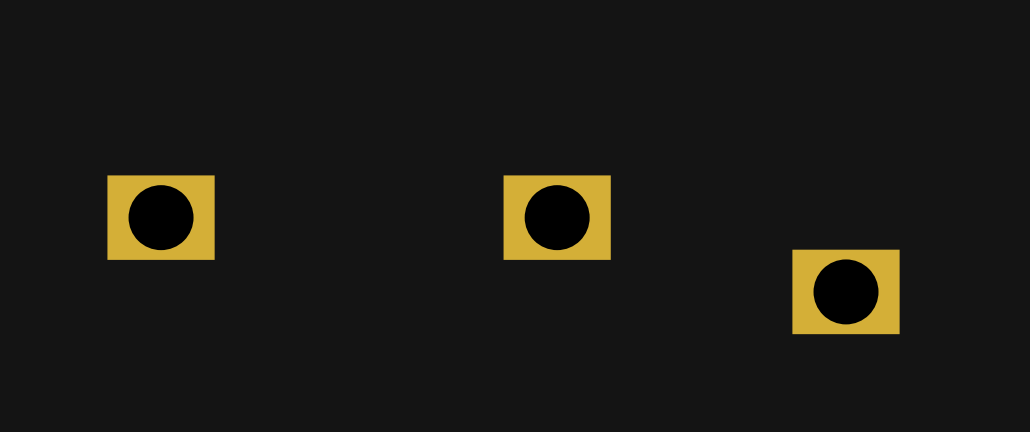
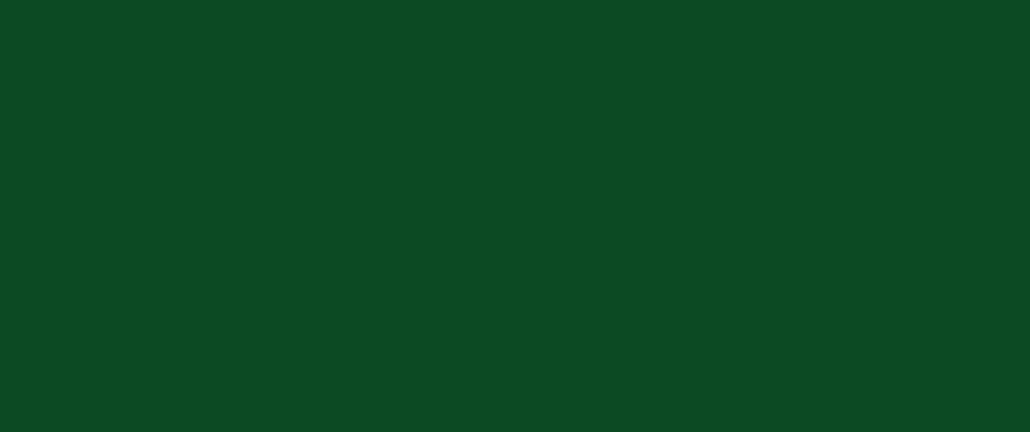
part: (161, 217) -> none
part: (557, 217) -> none
part: (846, 291) -> none

